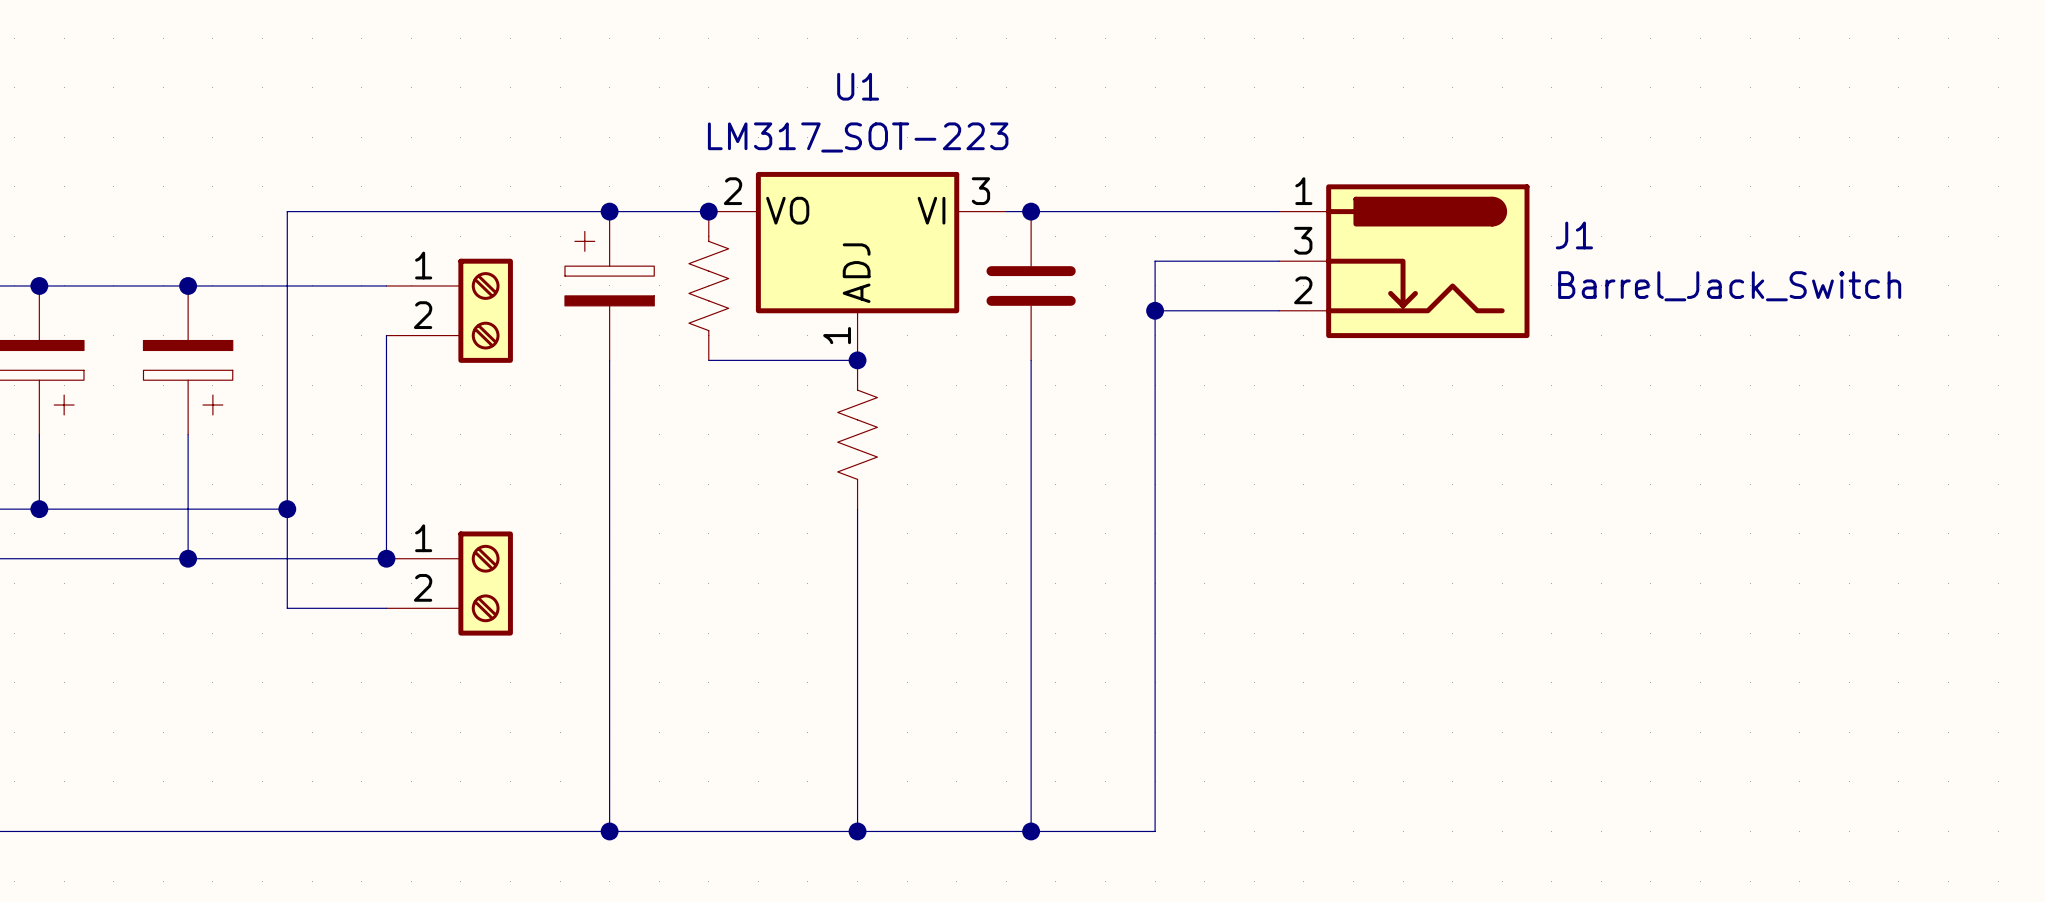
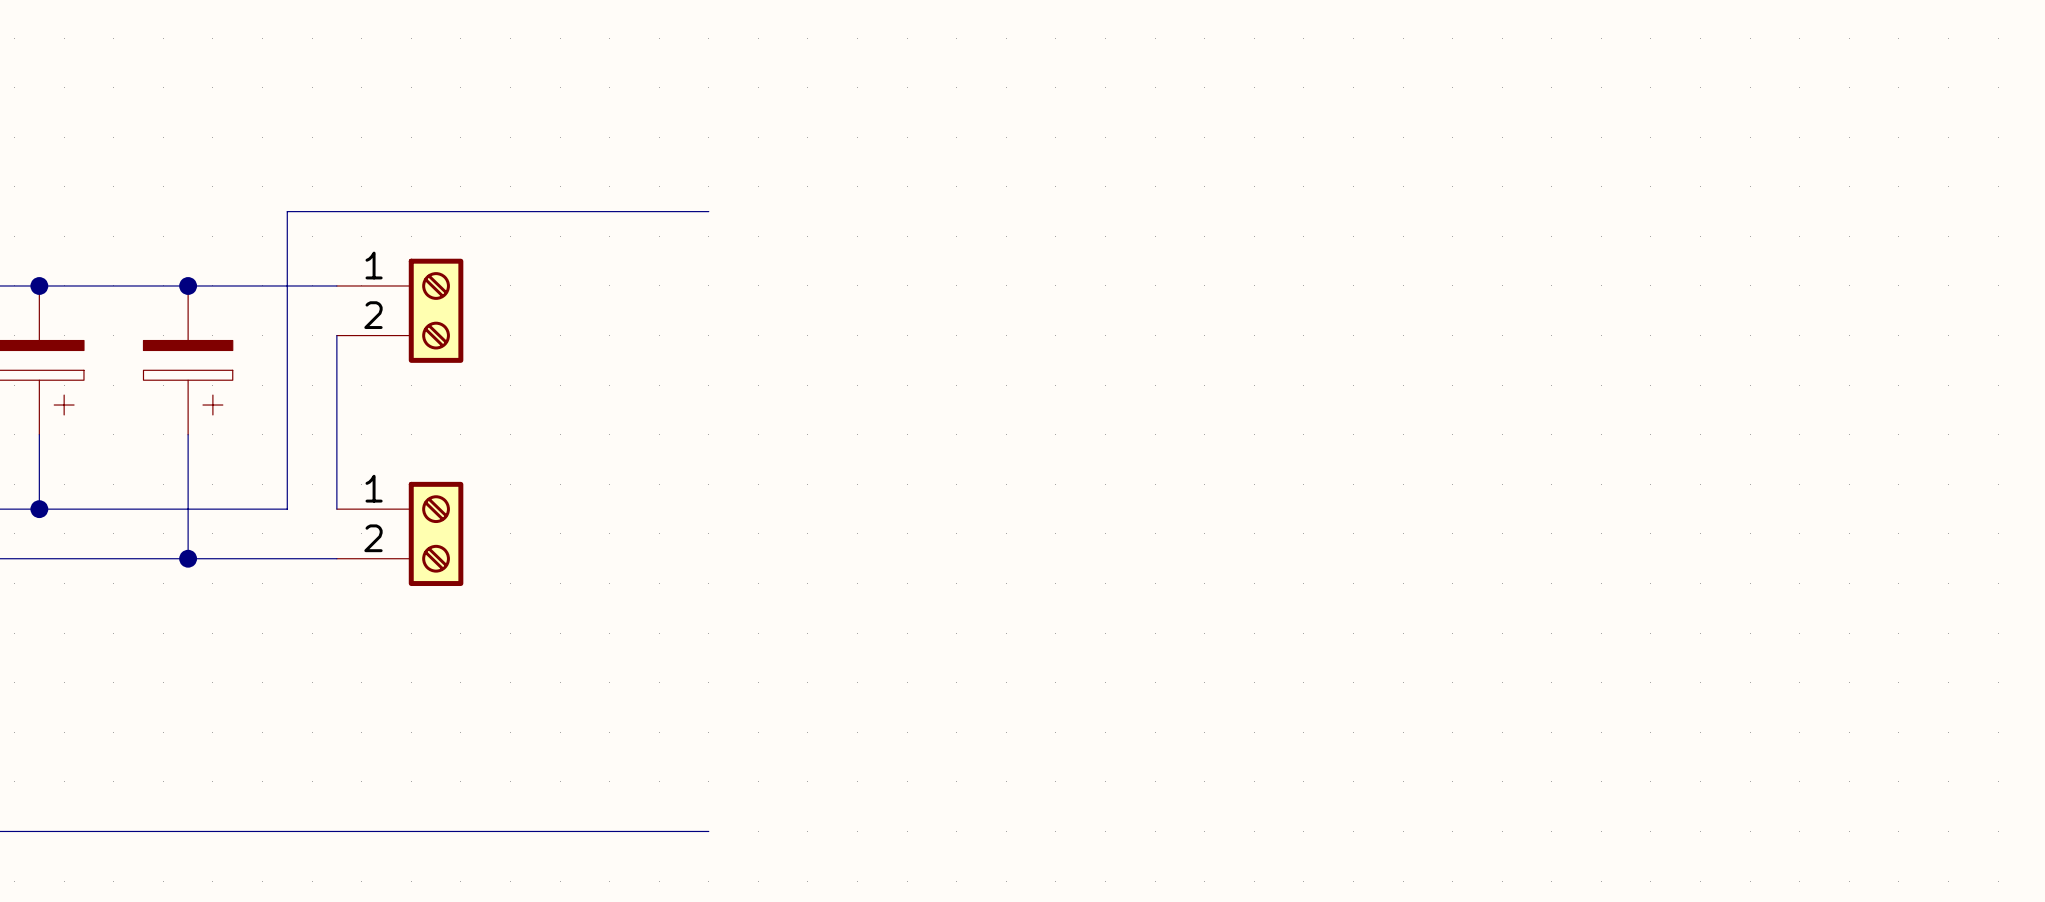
junction: (609, 211) -> none
junction: (708, 211) -> none
wire: (1006, 211) (1279, 211) -> none
junction: (1031, 211) -> none
wire: (1279, 261) (1155, 261) (1155, 831) (708, 831) -> none
J1: Barrel_Jack_Switch (1404, 261) -> none
U1: LM317_SOT-223 (857, 266) -> none
part: (609, 285) -> none
part: (708, 285) -> none
part: (1031, 285) -> none
part position: (449, 310) -> (400, 310)
wire: (1155, 310) (1279, 310) -> none
junction: (1155, 310) -> none
wire: none -> (336, 335) (336, 509)
wire: (386, 335) (386, 558) (336, 558) -> none
wire: (609, 360) (609, 831) -> none
wire: (708, 360) (857, 360) -> none
junction: (857, 360) -> none
wire: (1031, 360) (1031, 831) -> none
part: (857, 434) -> none
wire: (287, 509) (287, 608) (386, 608) -> none
junction: (287, 509) -> none
wire: (857, 509) (857, 831) -> none
junction: (386, 558) -> none
part position: (449, 583) -> (400, 533)
junction: (609, 831) -> none
junction: (857, 831) -> none
junction: (1031, 831) -> none

